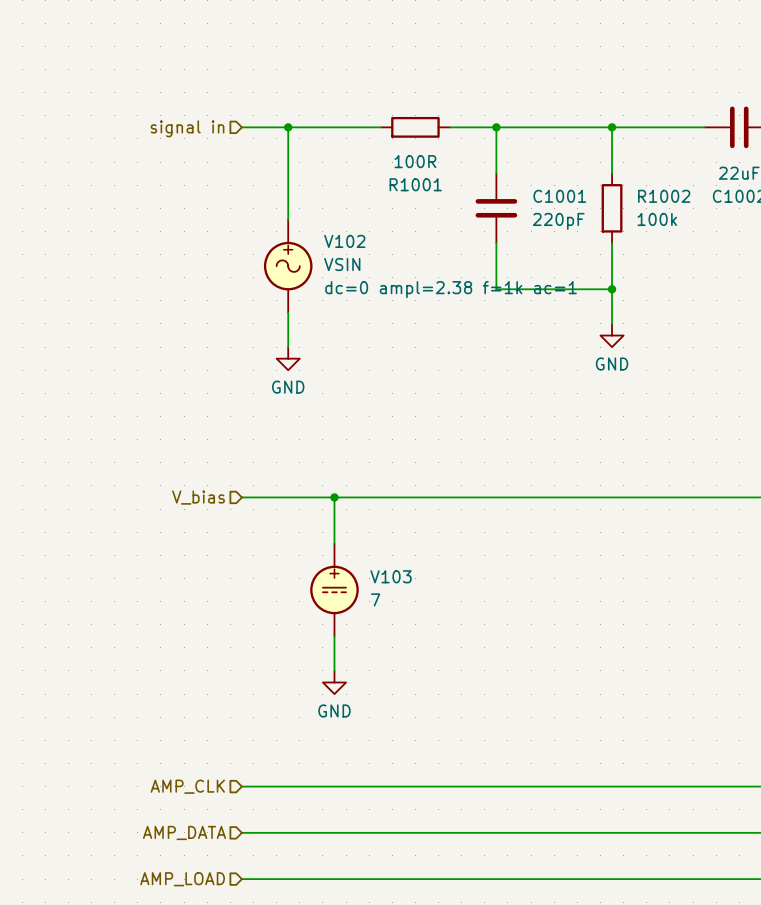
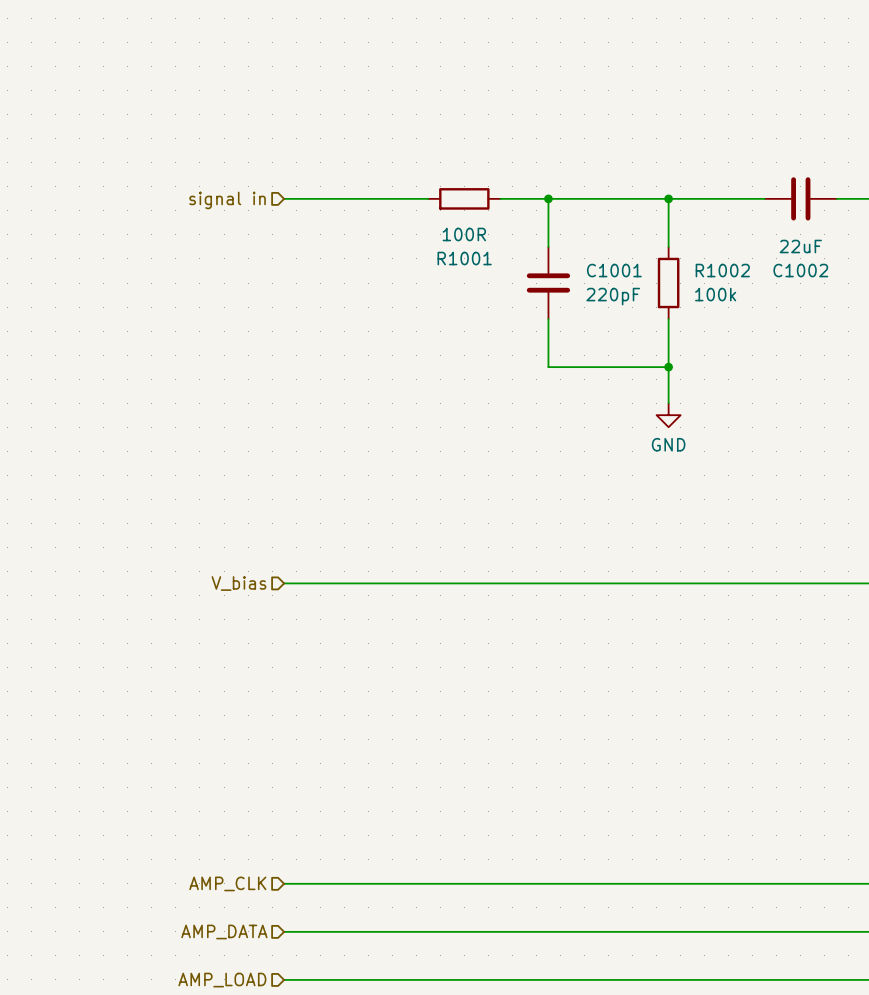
wire: (288, 127) (288, 219) -> none
junction: (288, 127) -> none
V102: VSIN (288, 266) -> none
wire: (288, 312) (288, 347) -> none
power symbol: GND (288, 358) -> none
wire: (334, 497) (334, 543) -> none
junction: (334, 497) -> none
V103: 7 (334, 589) -> none
wire: (334, 636) (334, 670) -> none
power symbol: GND (334, 682) -> none

